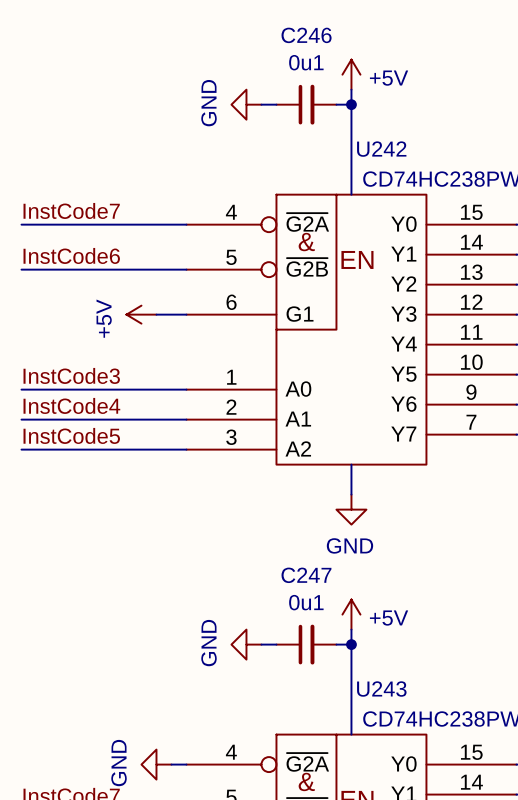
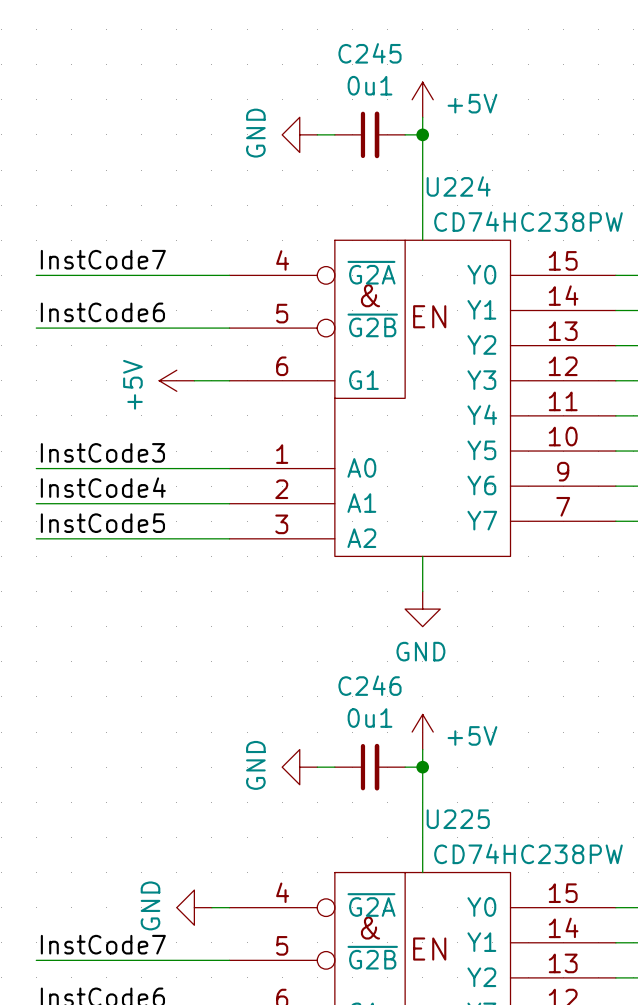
C246 name: C246 (306, 35) -> C245 (370, 53)
U242 name: U242 (381, 149) -> U224 (458, 186)
C247 name: C247 (306, 575) -> C246 (370, 685)
U243 name: U243 (381, 689) -> U225 (458, 819)

